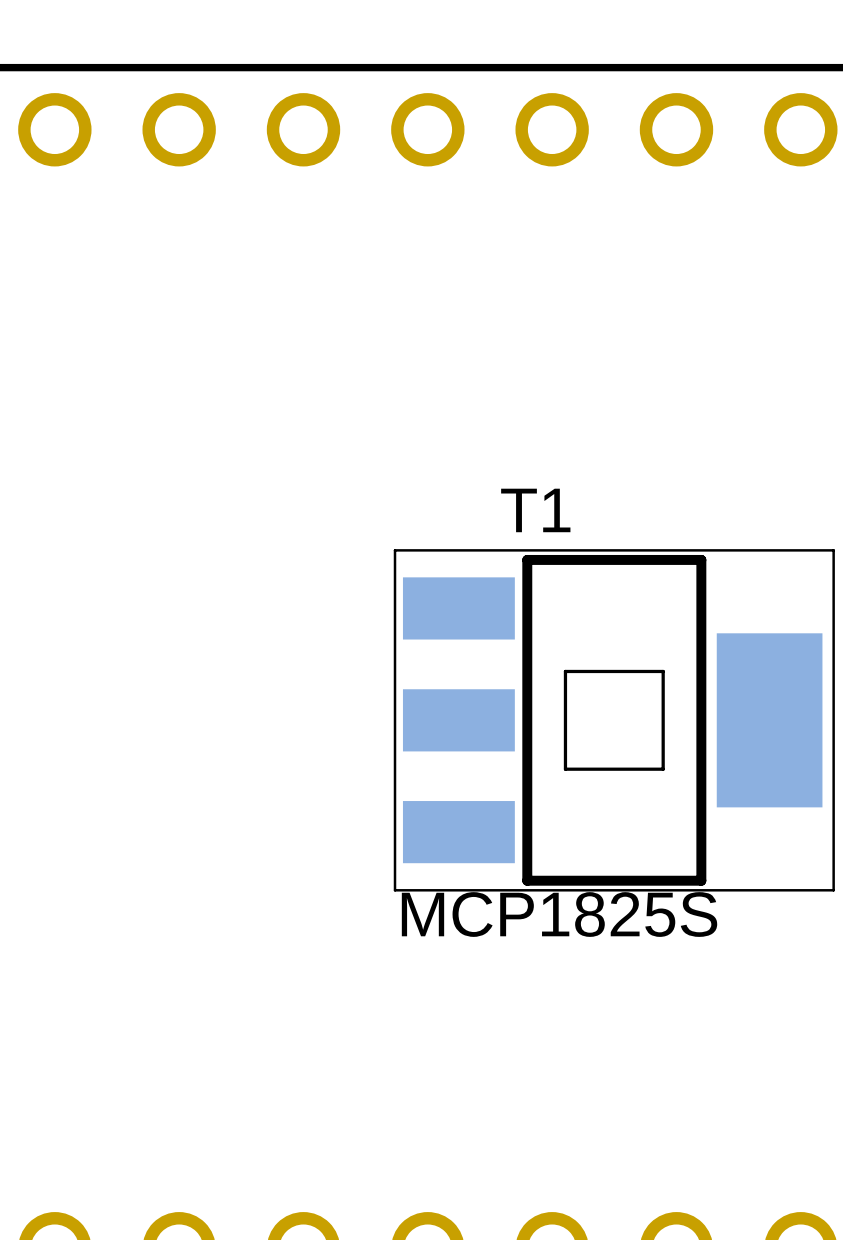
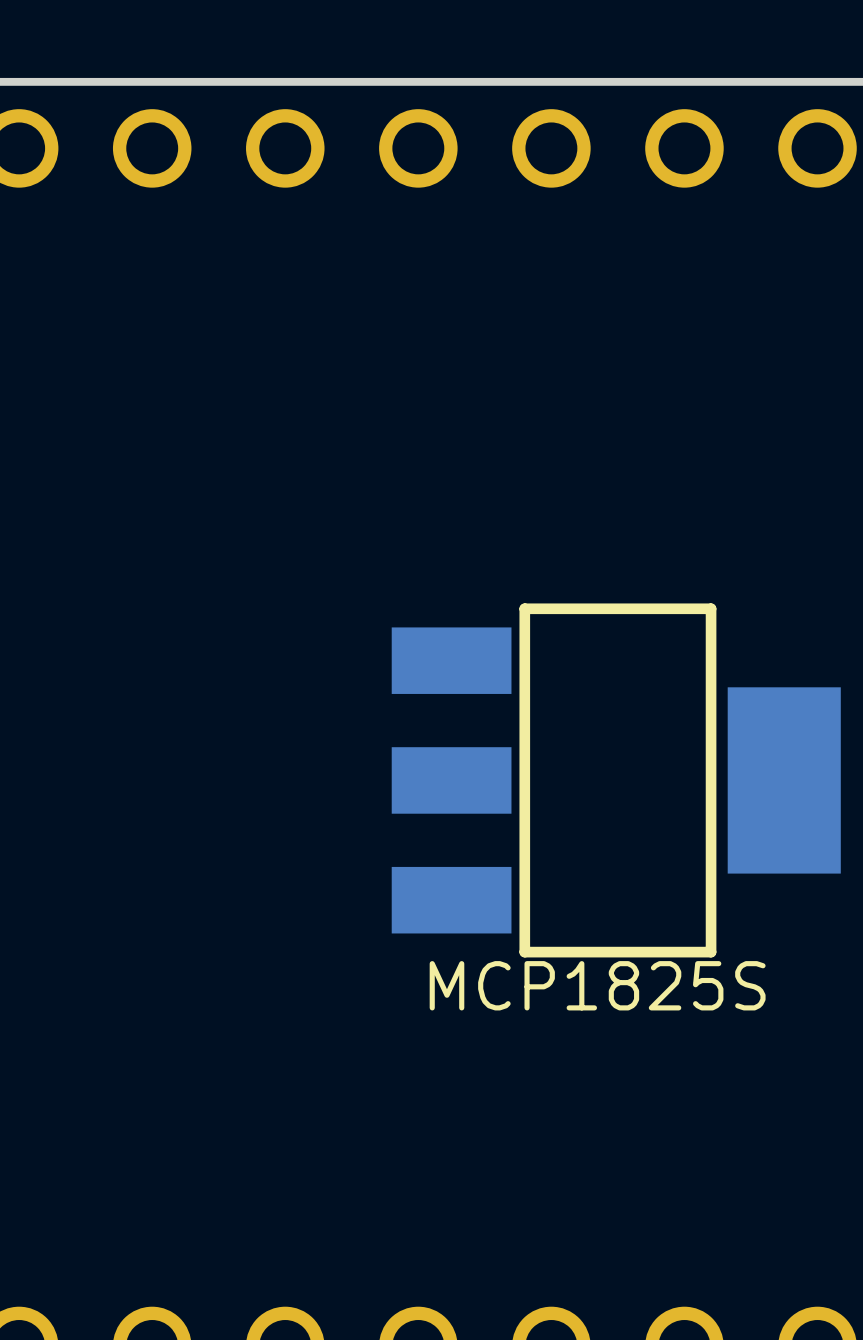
part: none -> MCP1825S (616, 780)
T1: MCP1825S (614, 720) -> none

